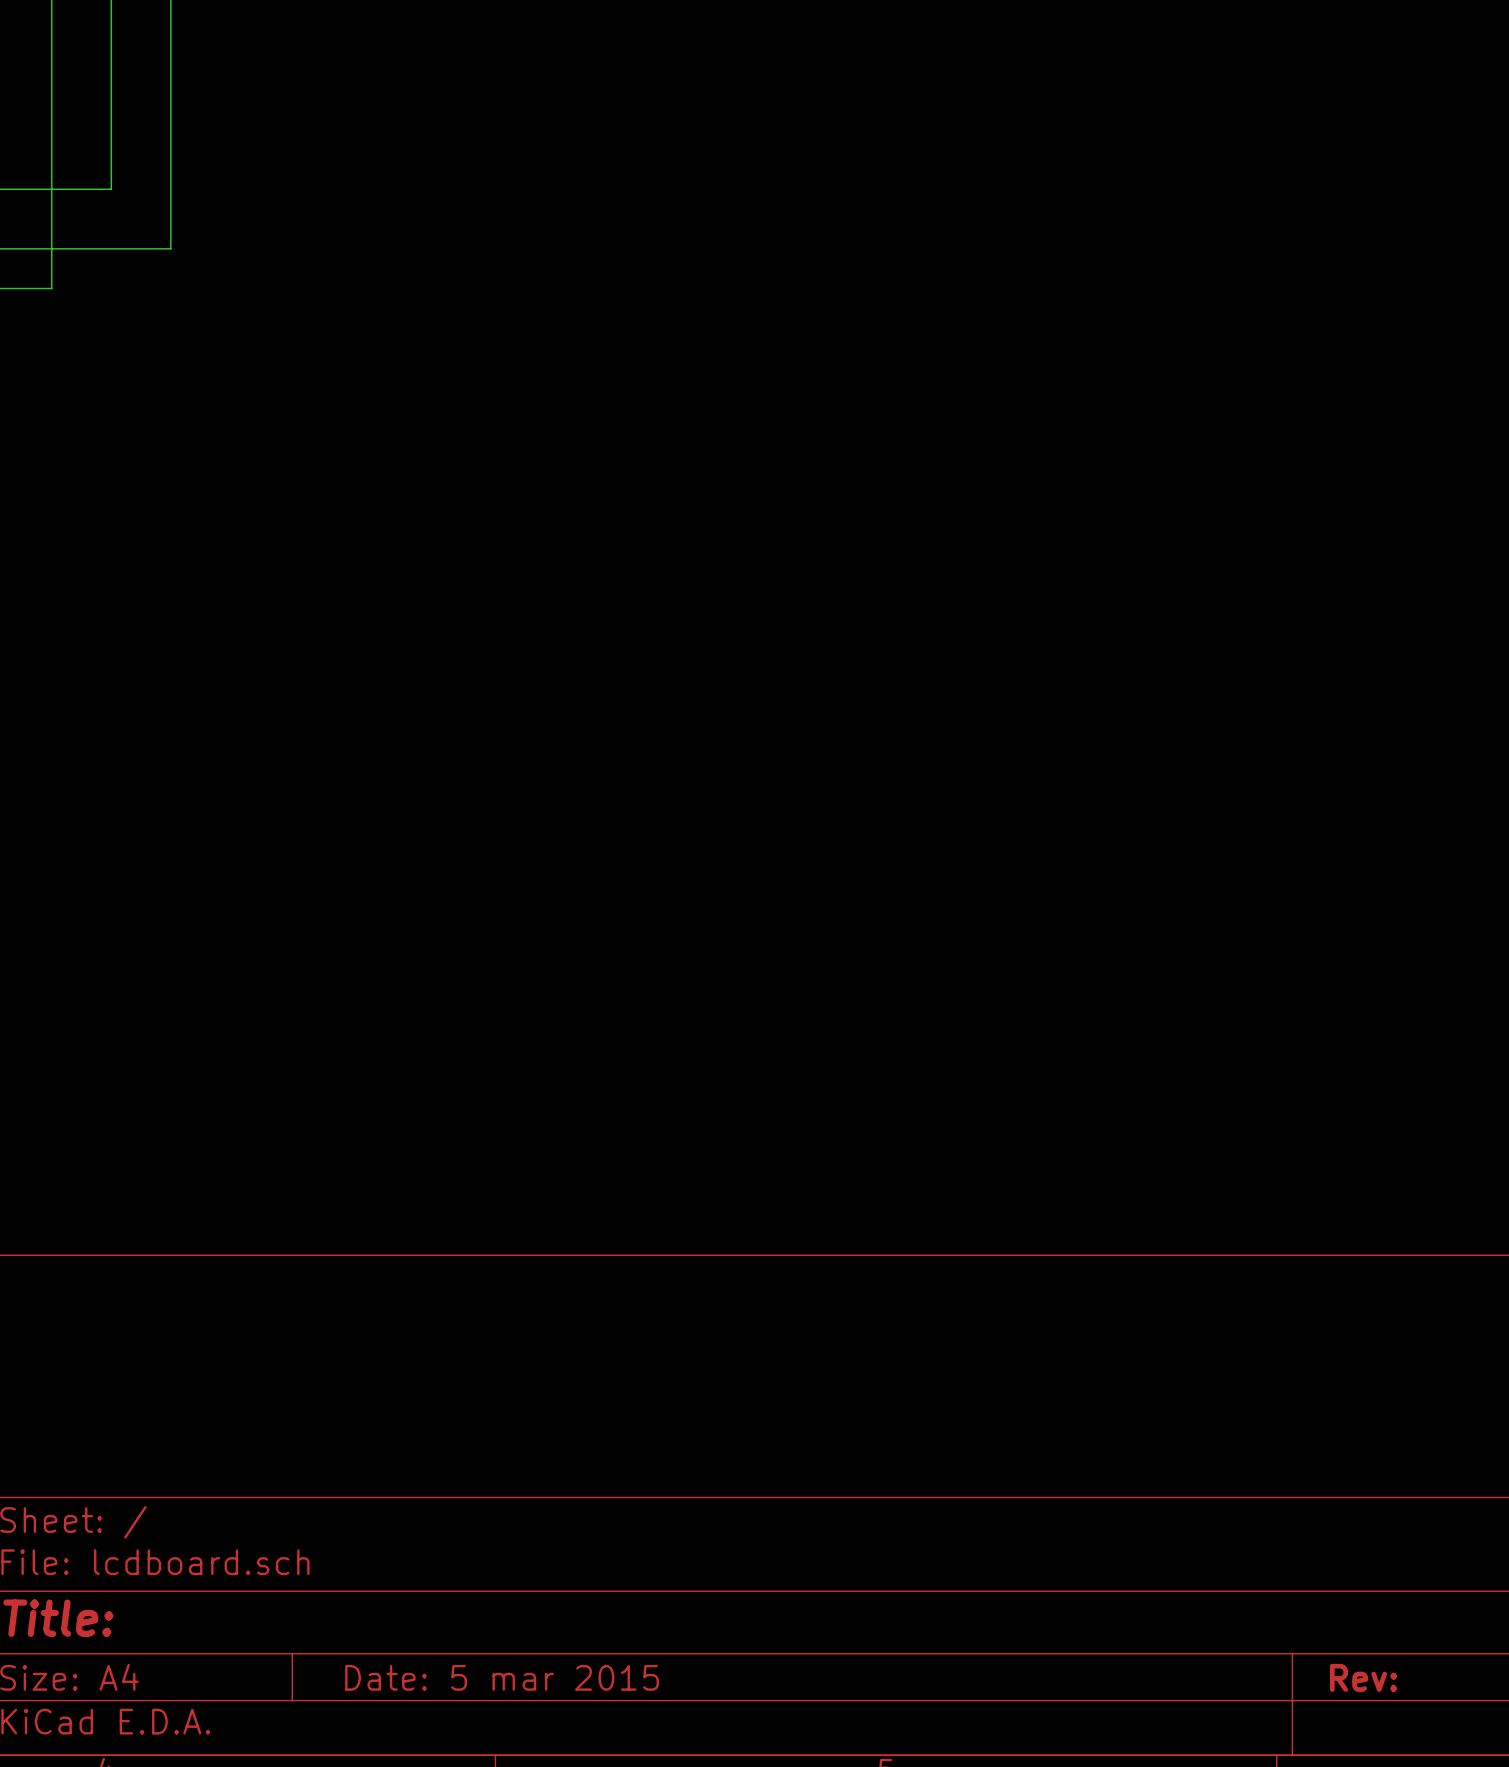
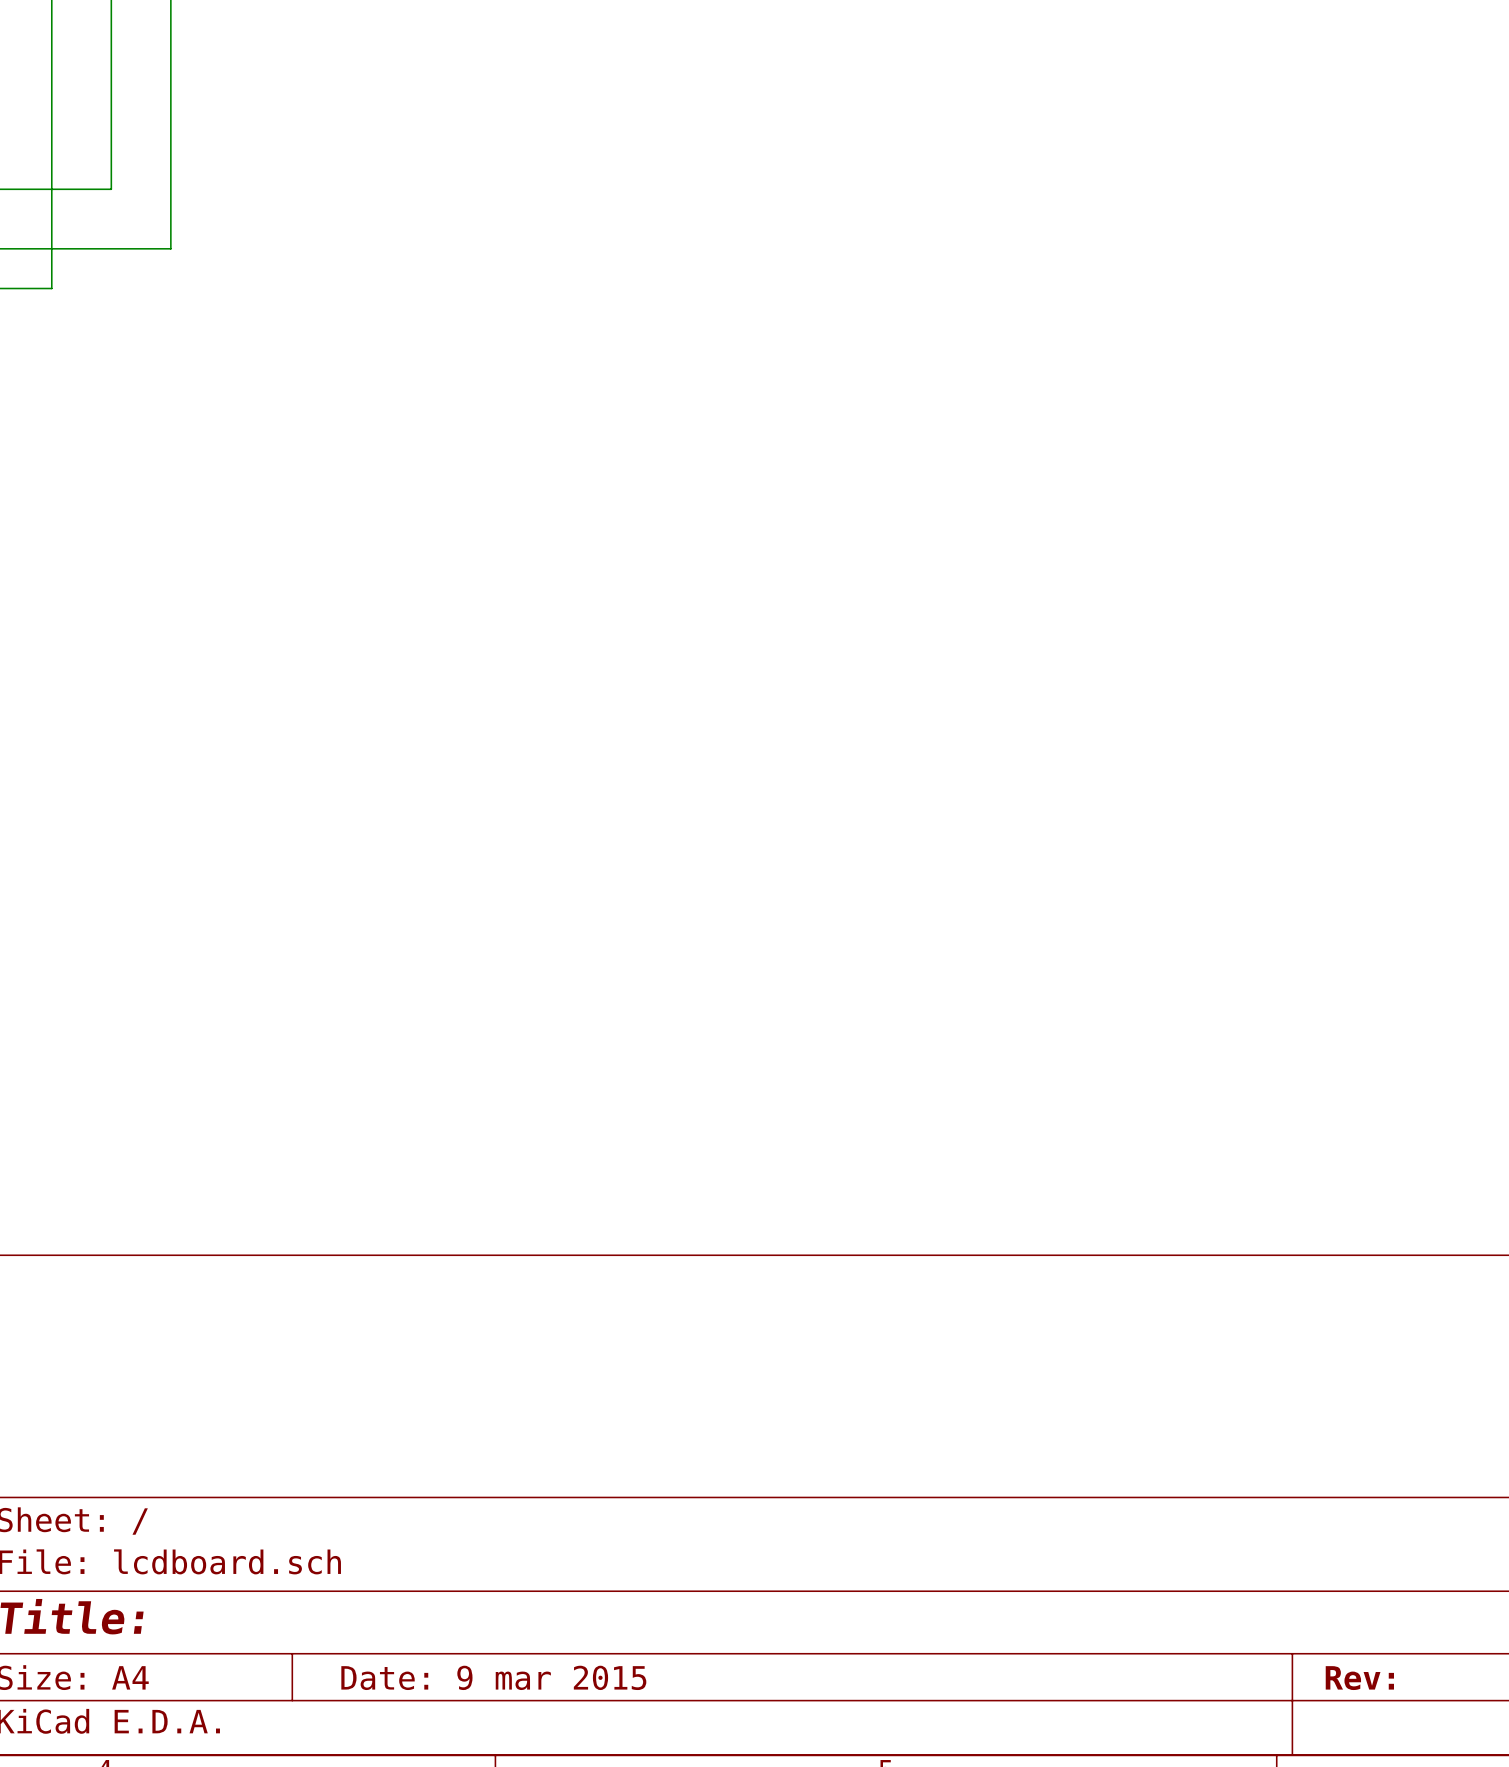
title block: Date: 5 mar 2015 (502, 1677) -> Date: 9 mar 2015 (493, 1677)

